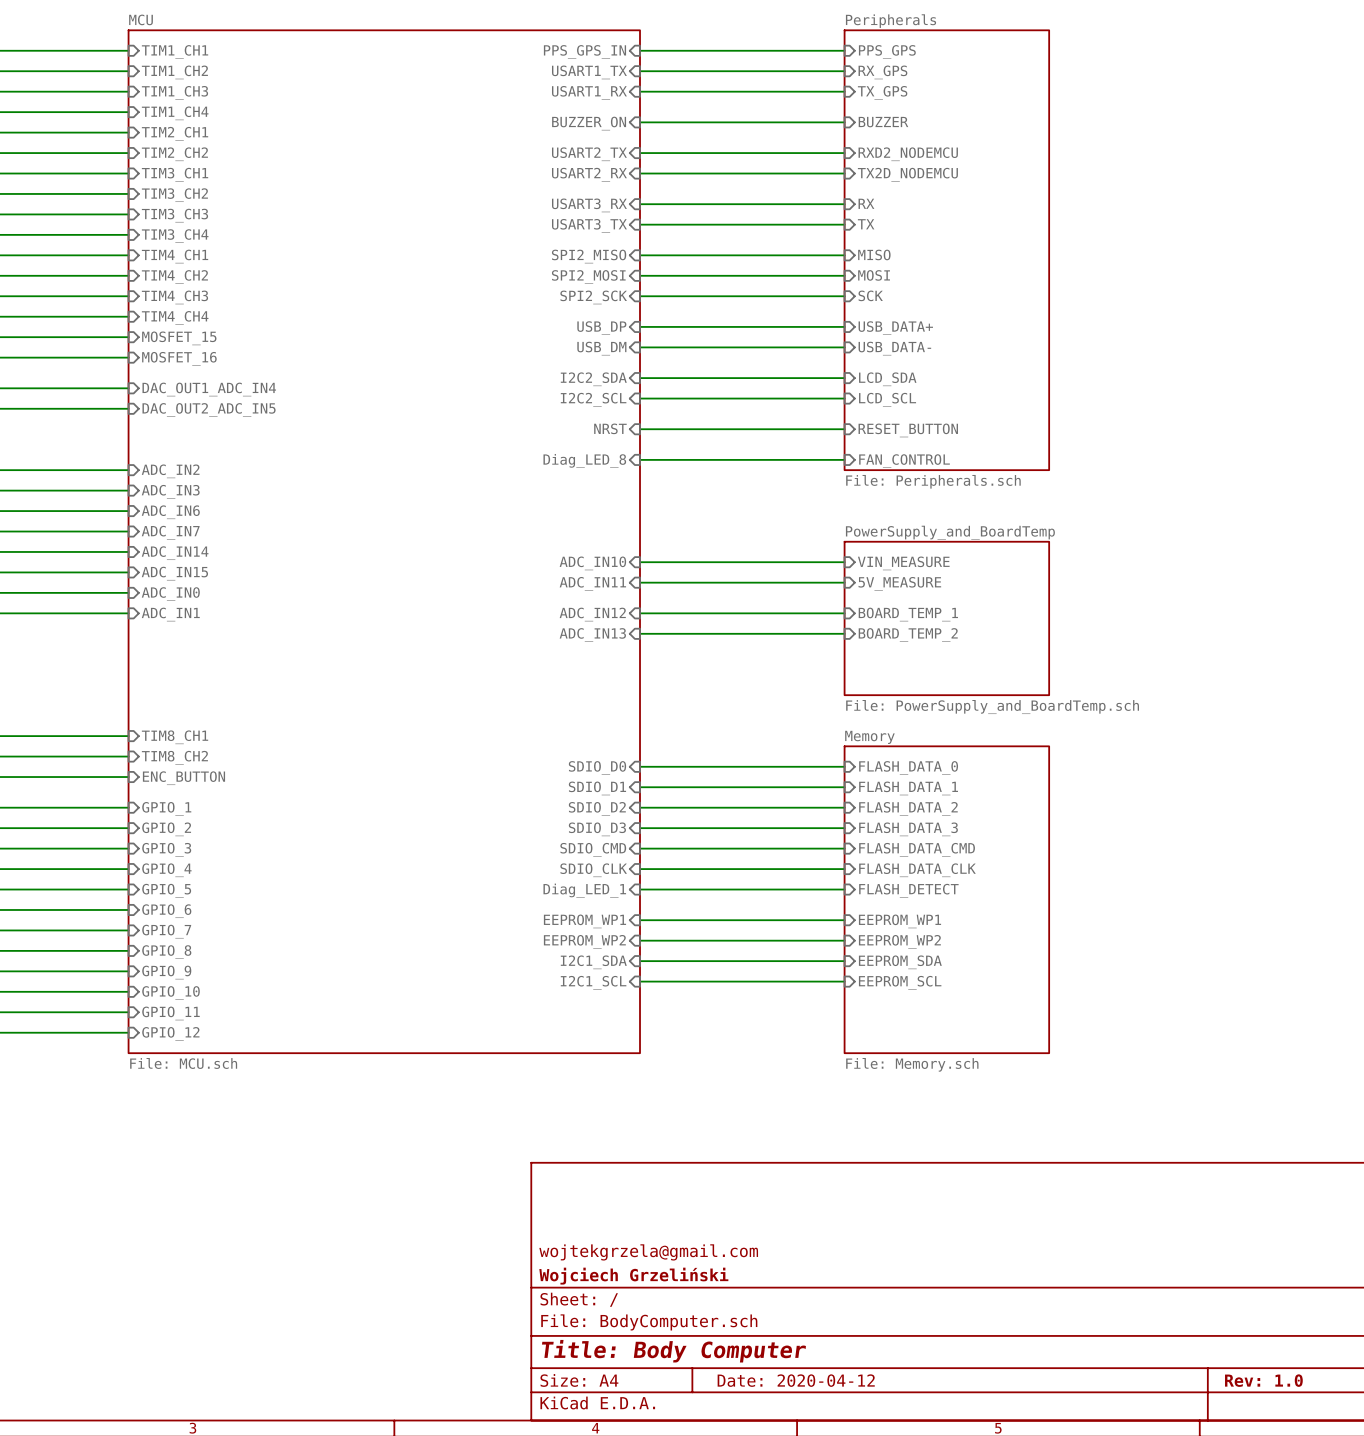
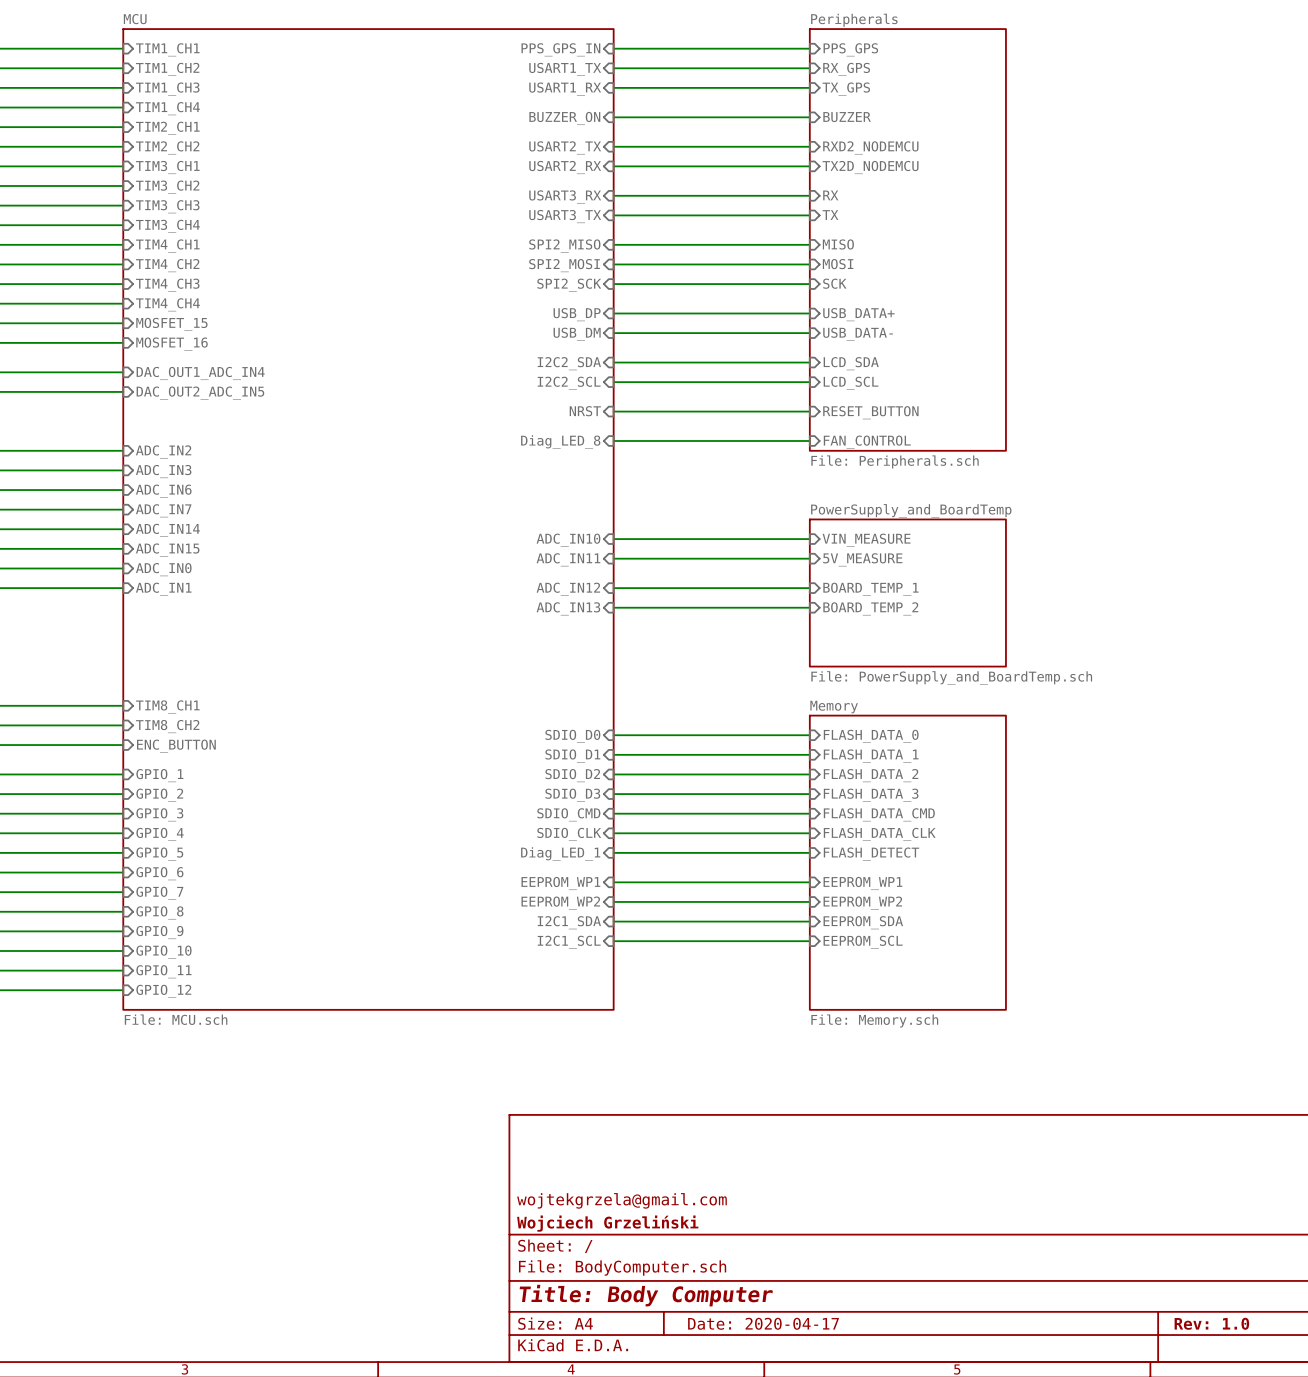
title block: Date: 2020-04-12 (796, 1380) -> Date: 2020-04-17 (763, 1323)

